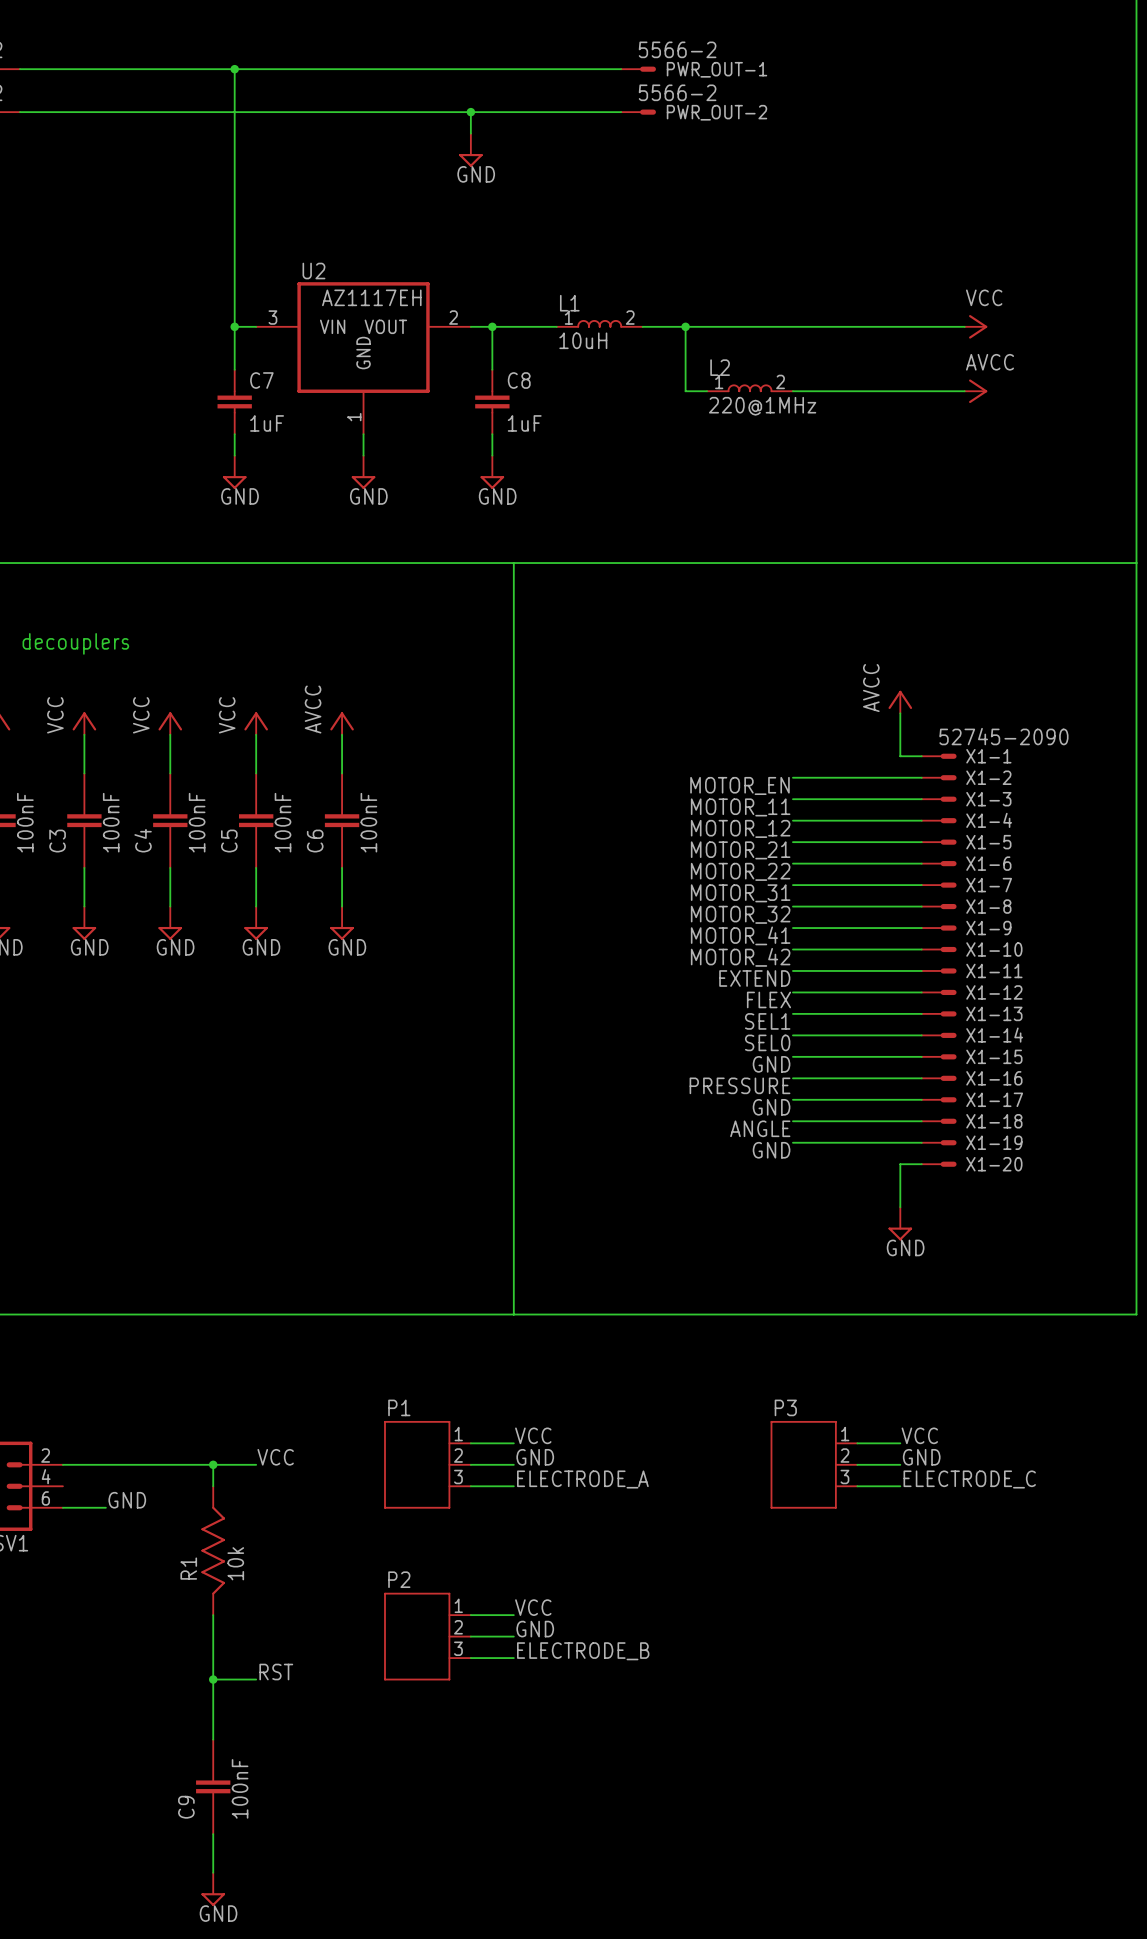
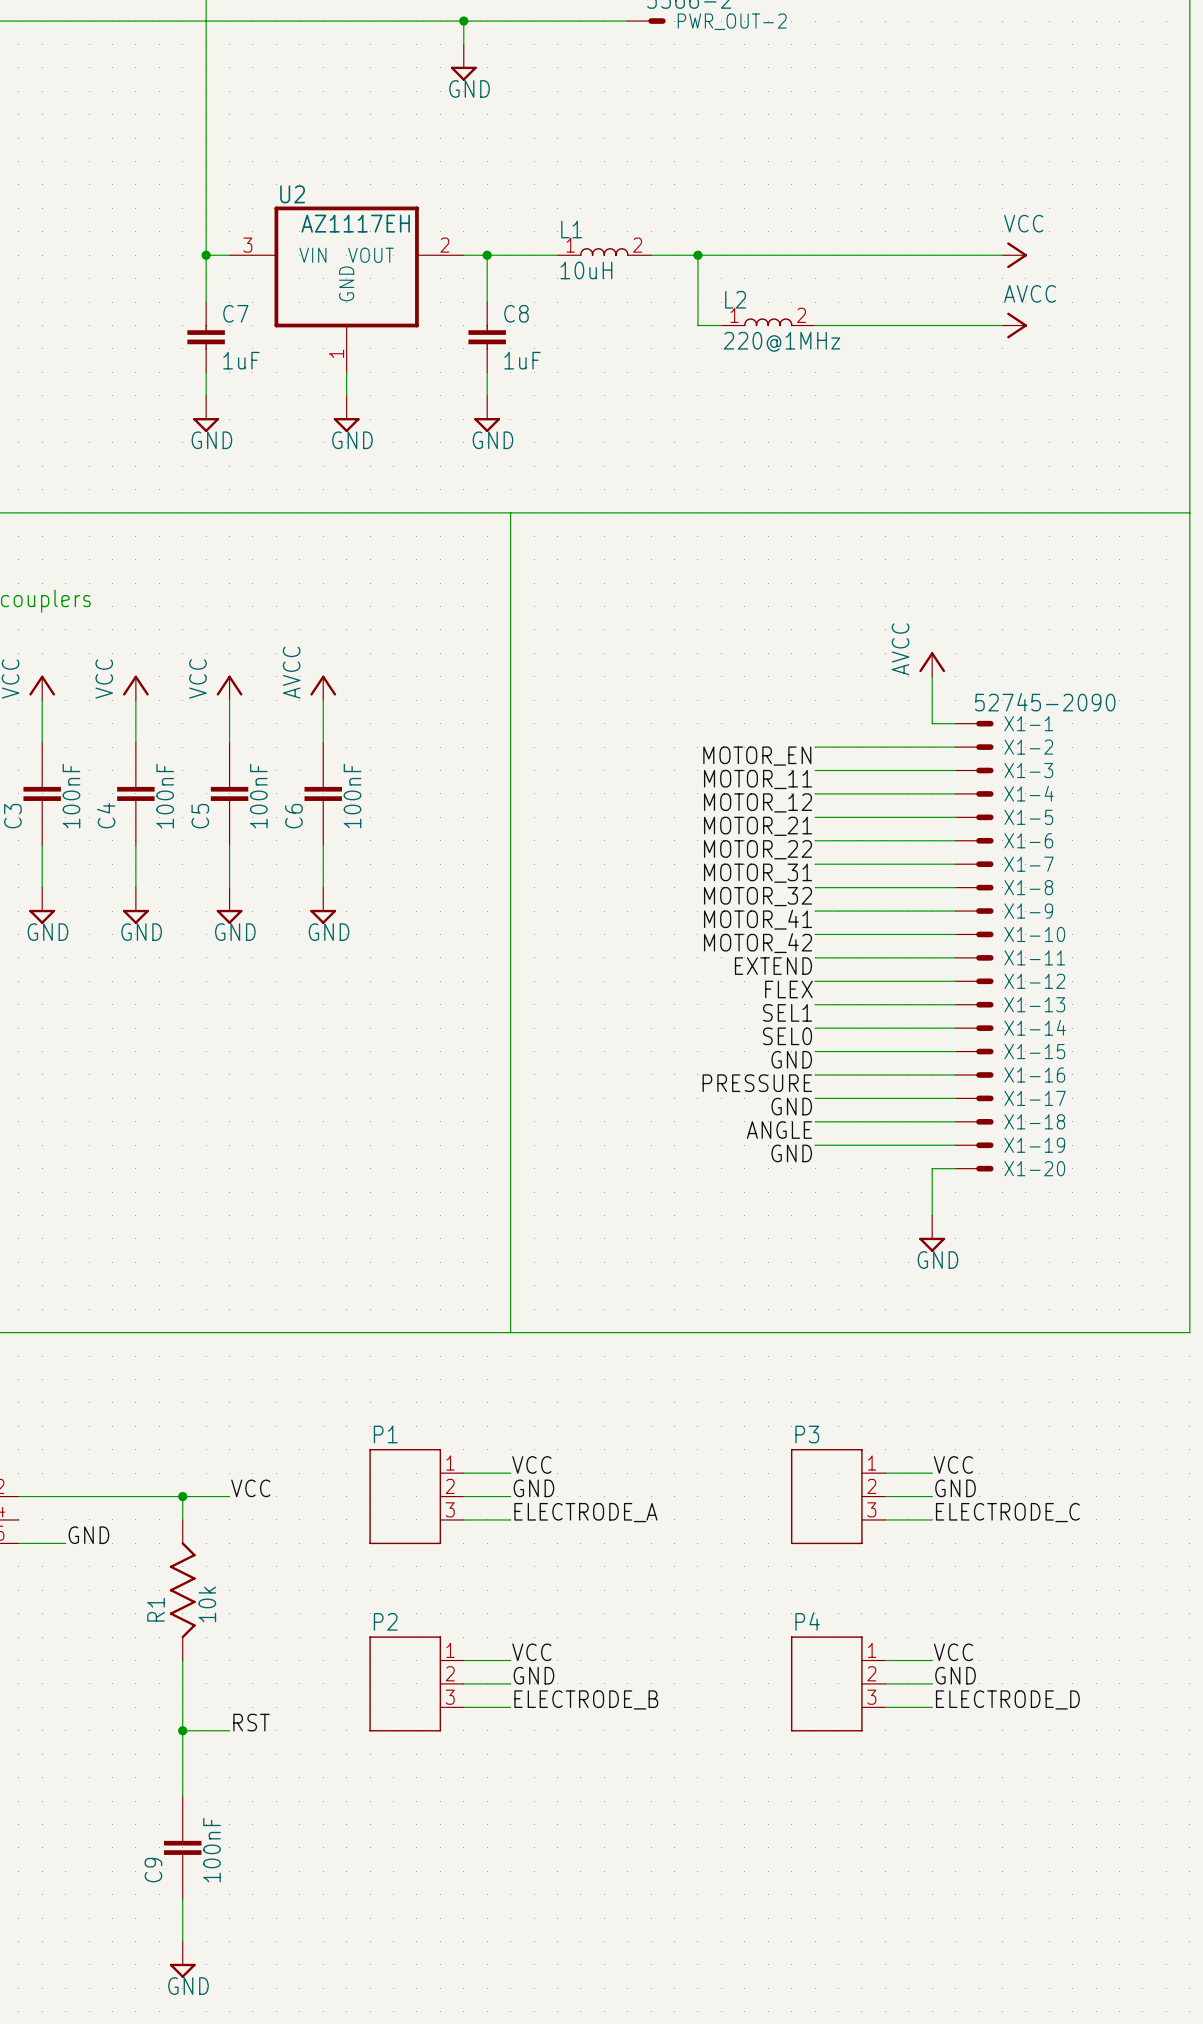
label: none -> VCC (953, 1652)
wire: none -> (885, 1660) (932, 1660)
label: none -> GND (955, 1675)
P4: none -> (838, 1683)
wire: none -> (885, 1683) (932, 1683)
label: none -> ELECTRODE_D (1007, 1699)
wire: none -> (885, 1707) (932, 1707)

